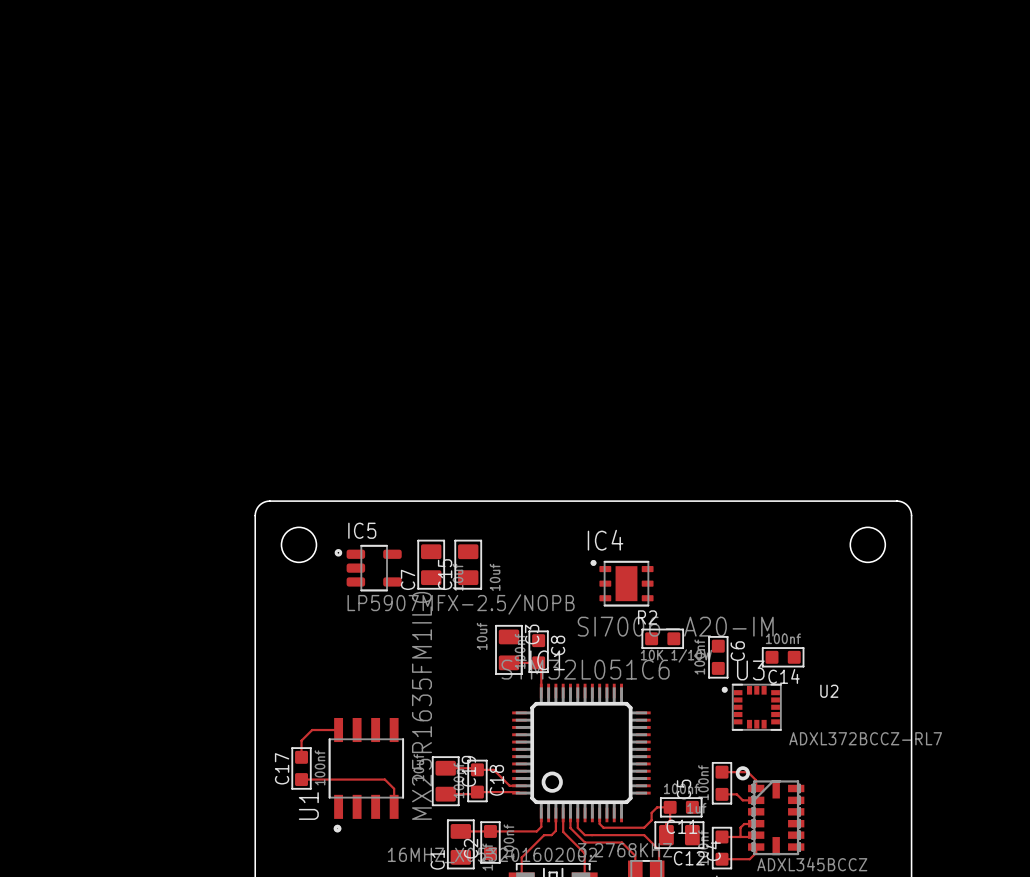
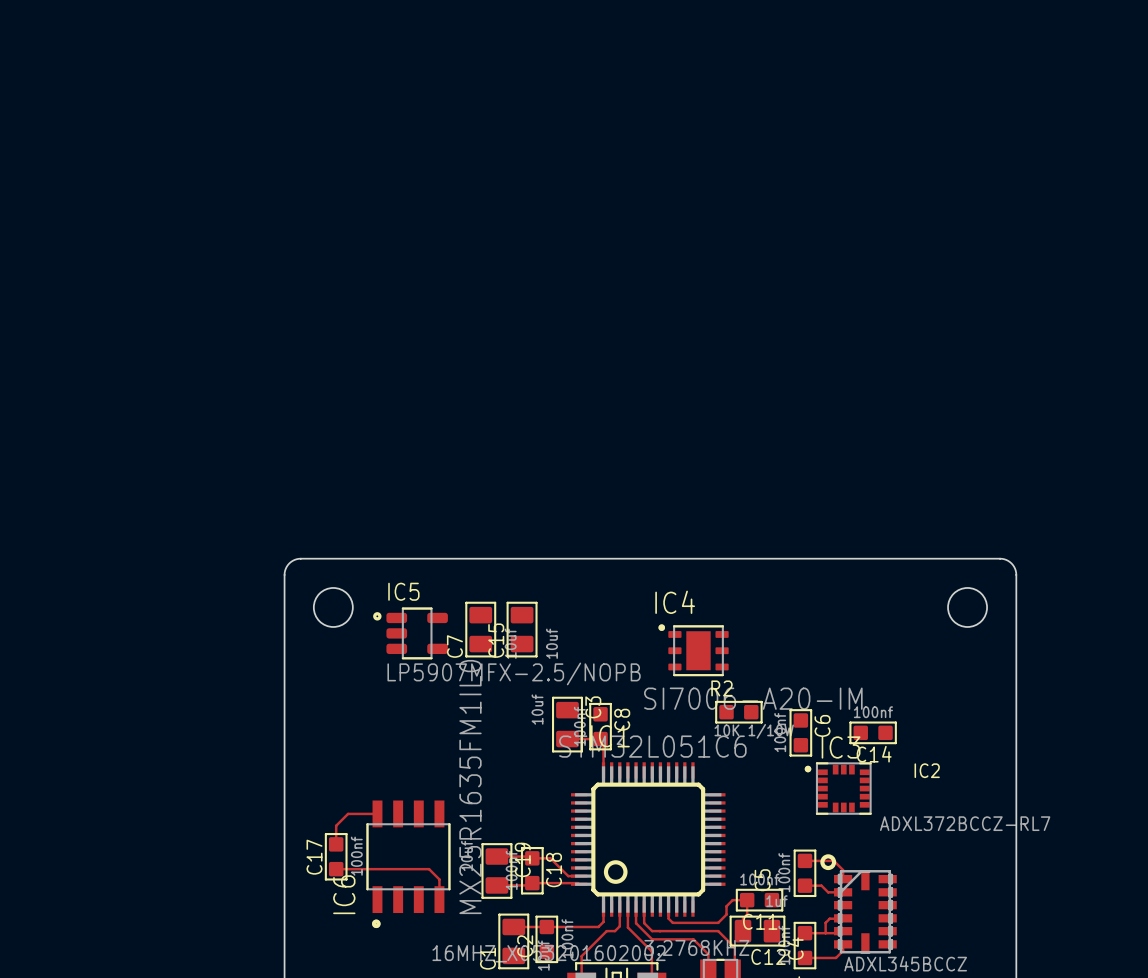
U3 name: U3 (750, 670) -> IC3 (841, 747)
U2 name: U2 (829, 691) -> IC2 (927, 770)
U1 name: U1 (308, 806) -> IC6 (344, 894)

